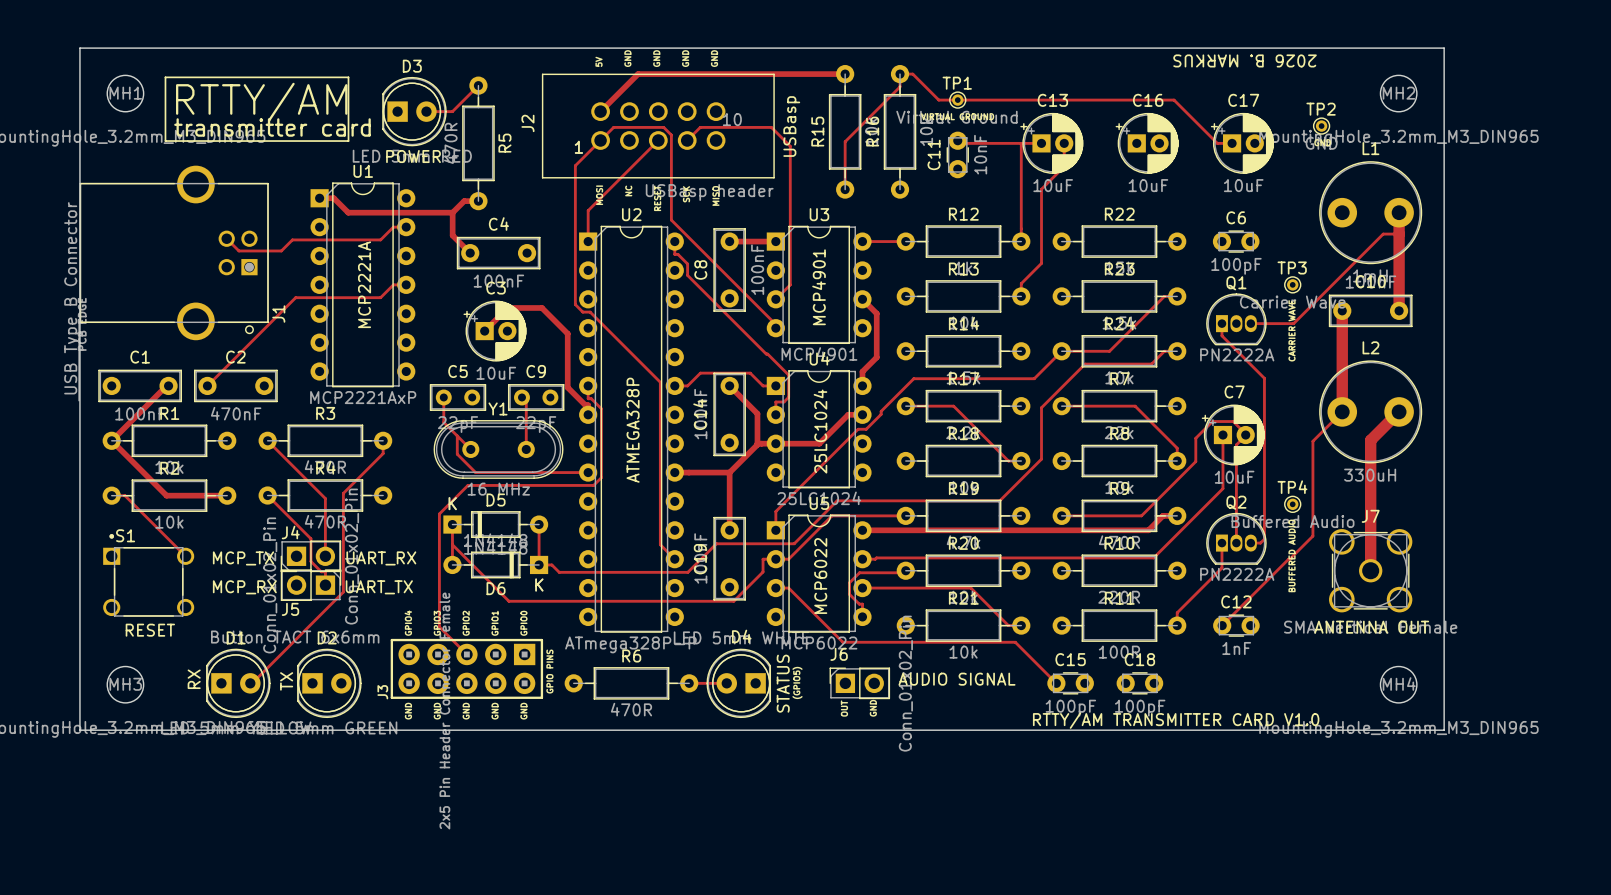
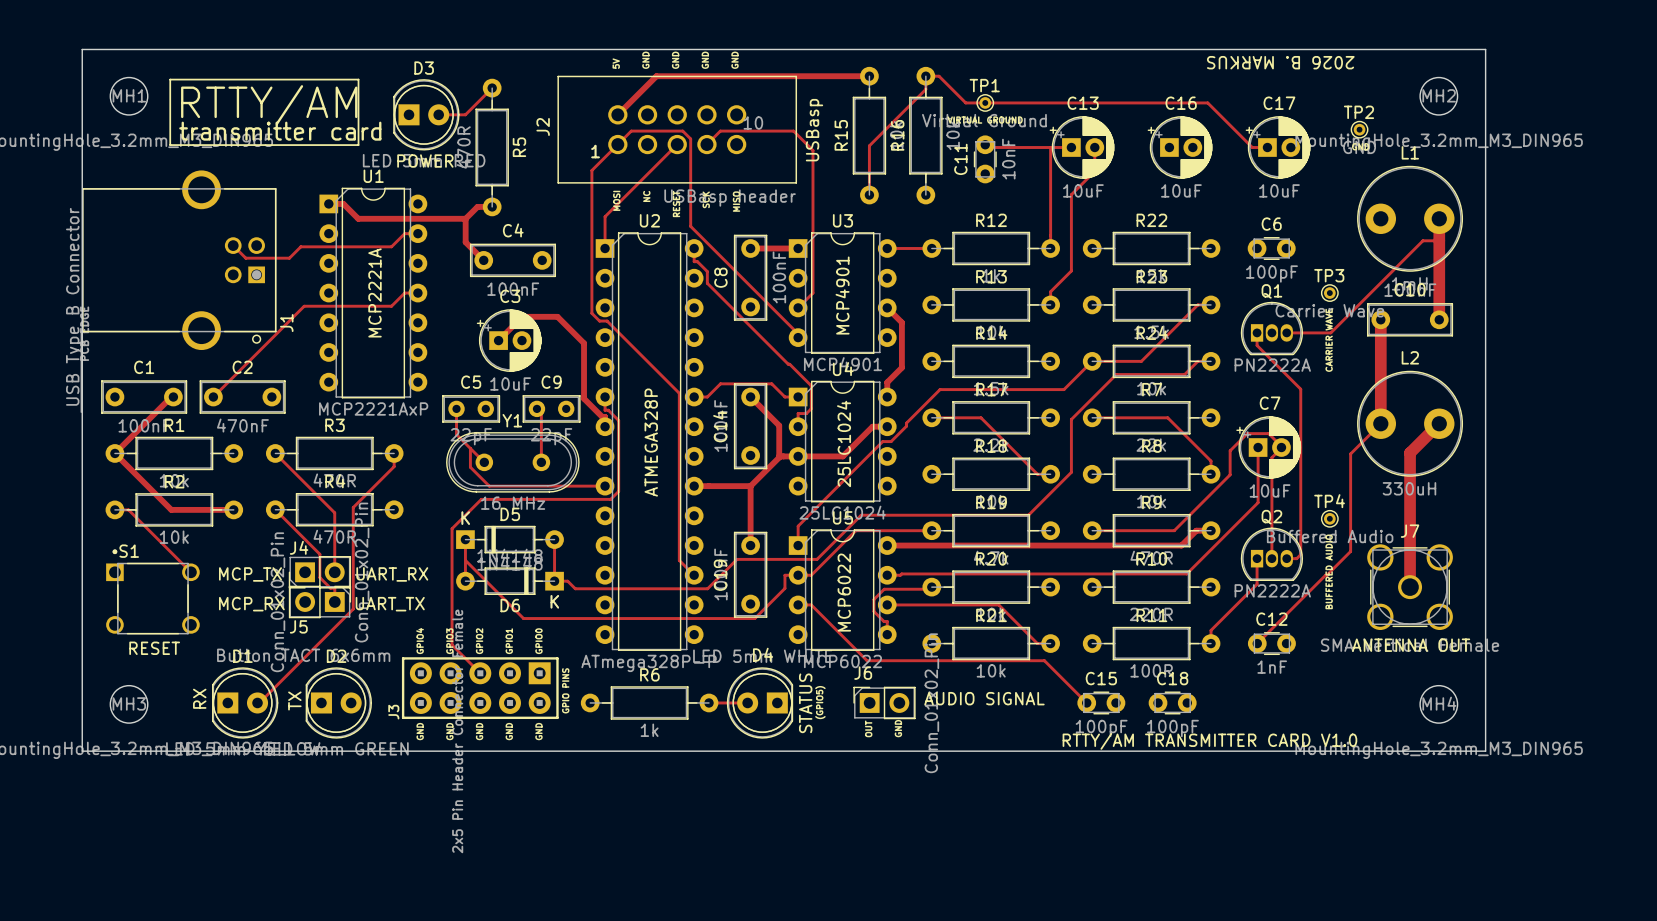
R6 value: 470R (631, 709) -> 1k (649, 730)

